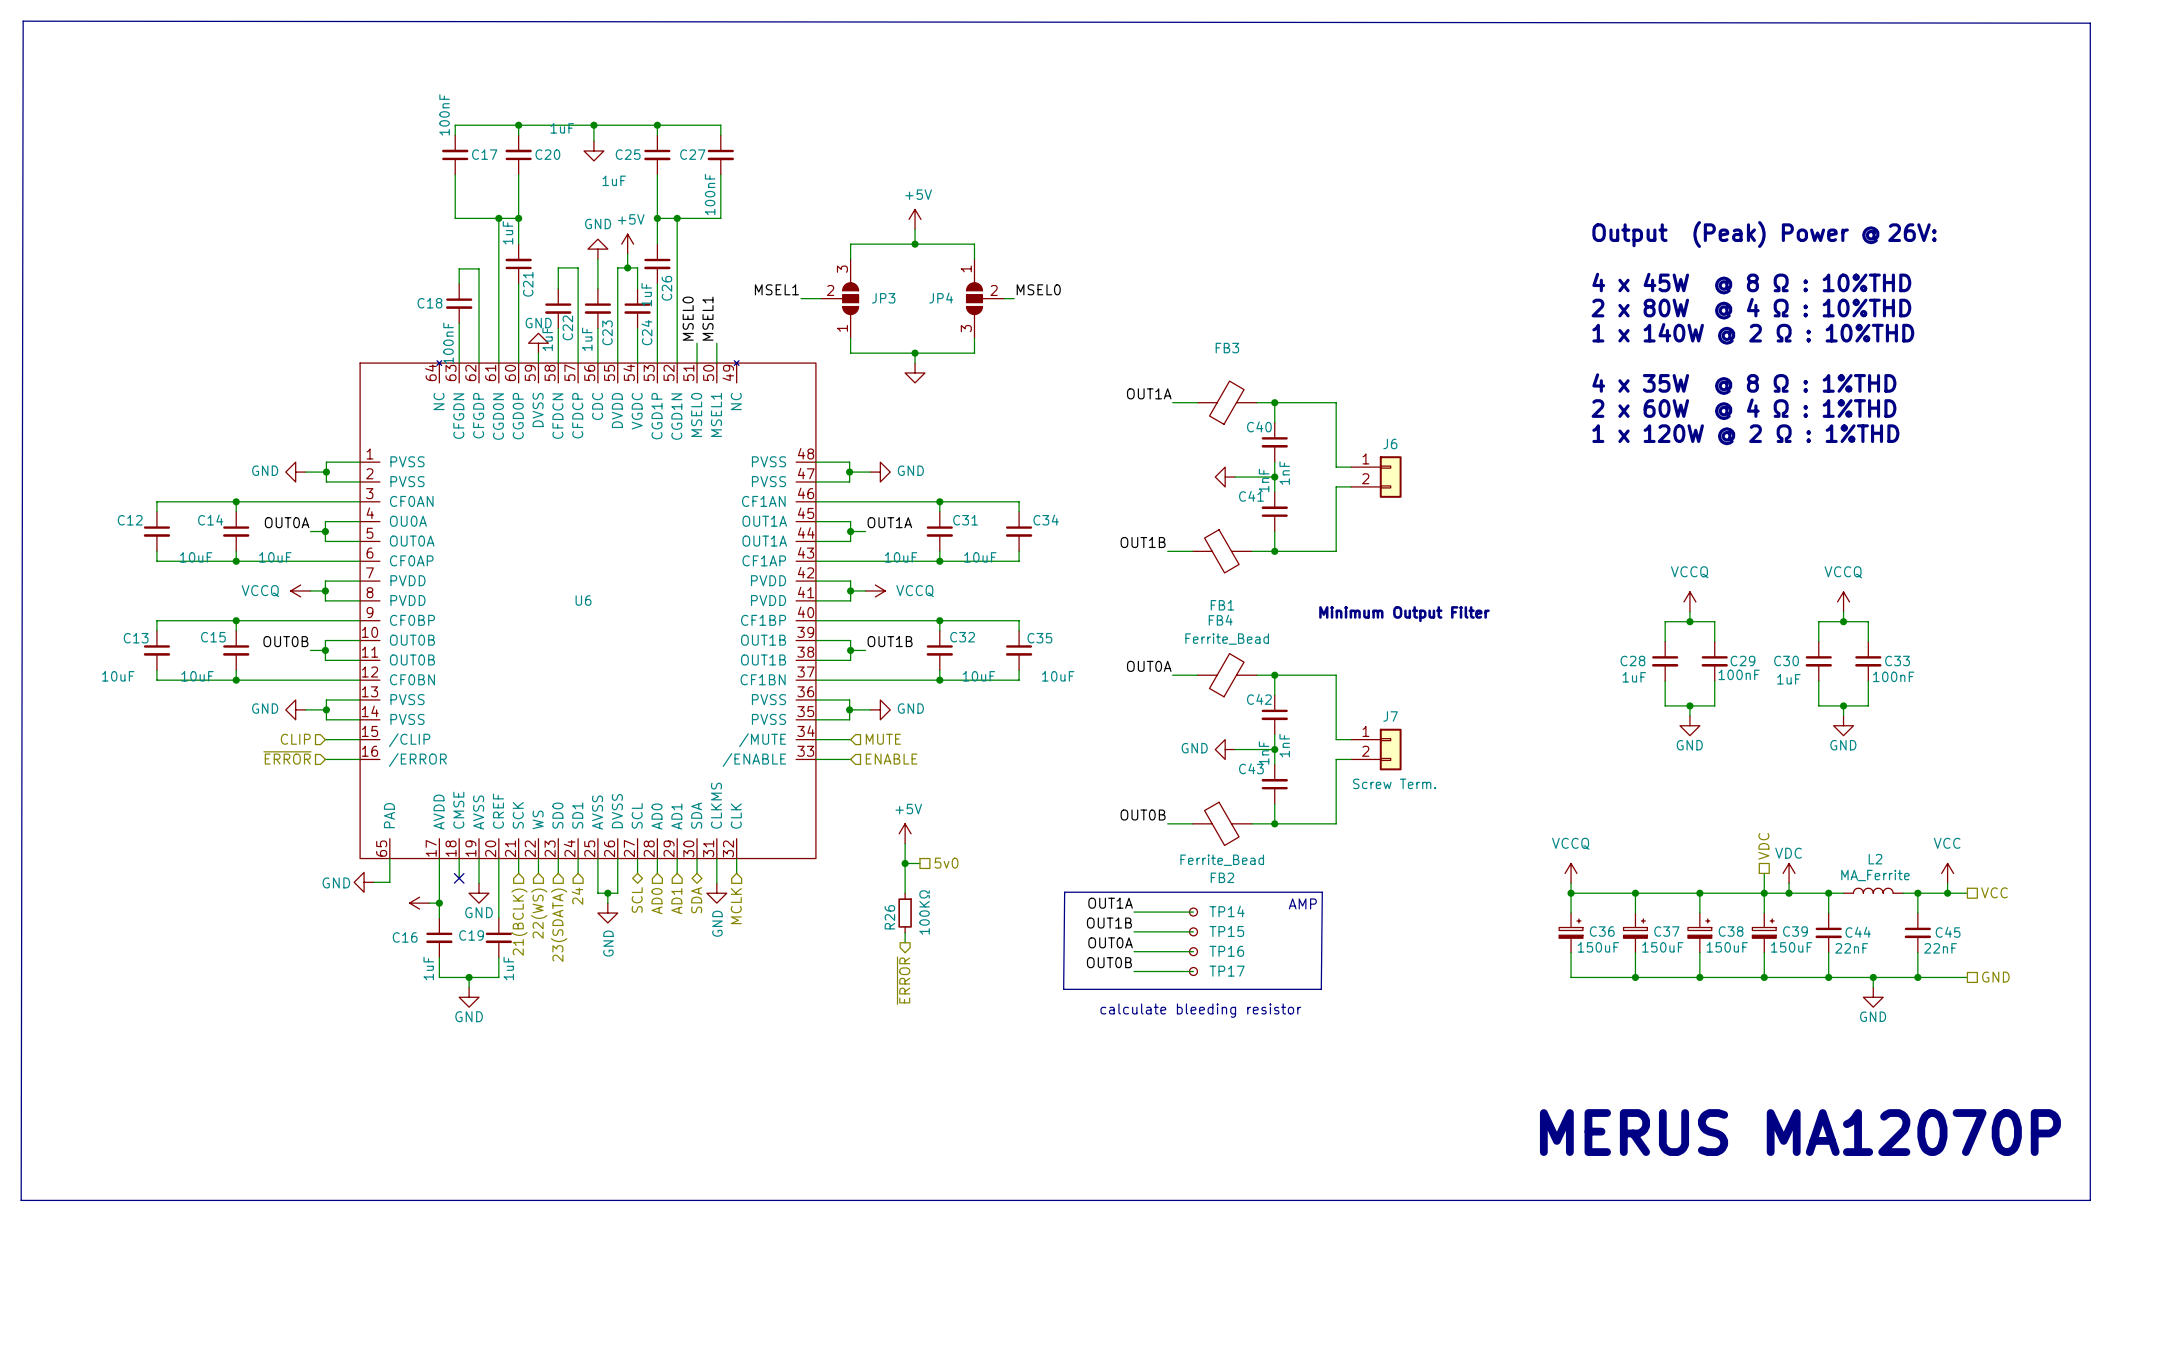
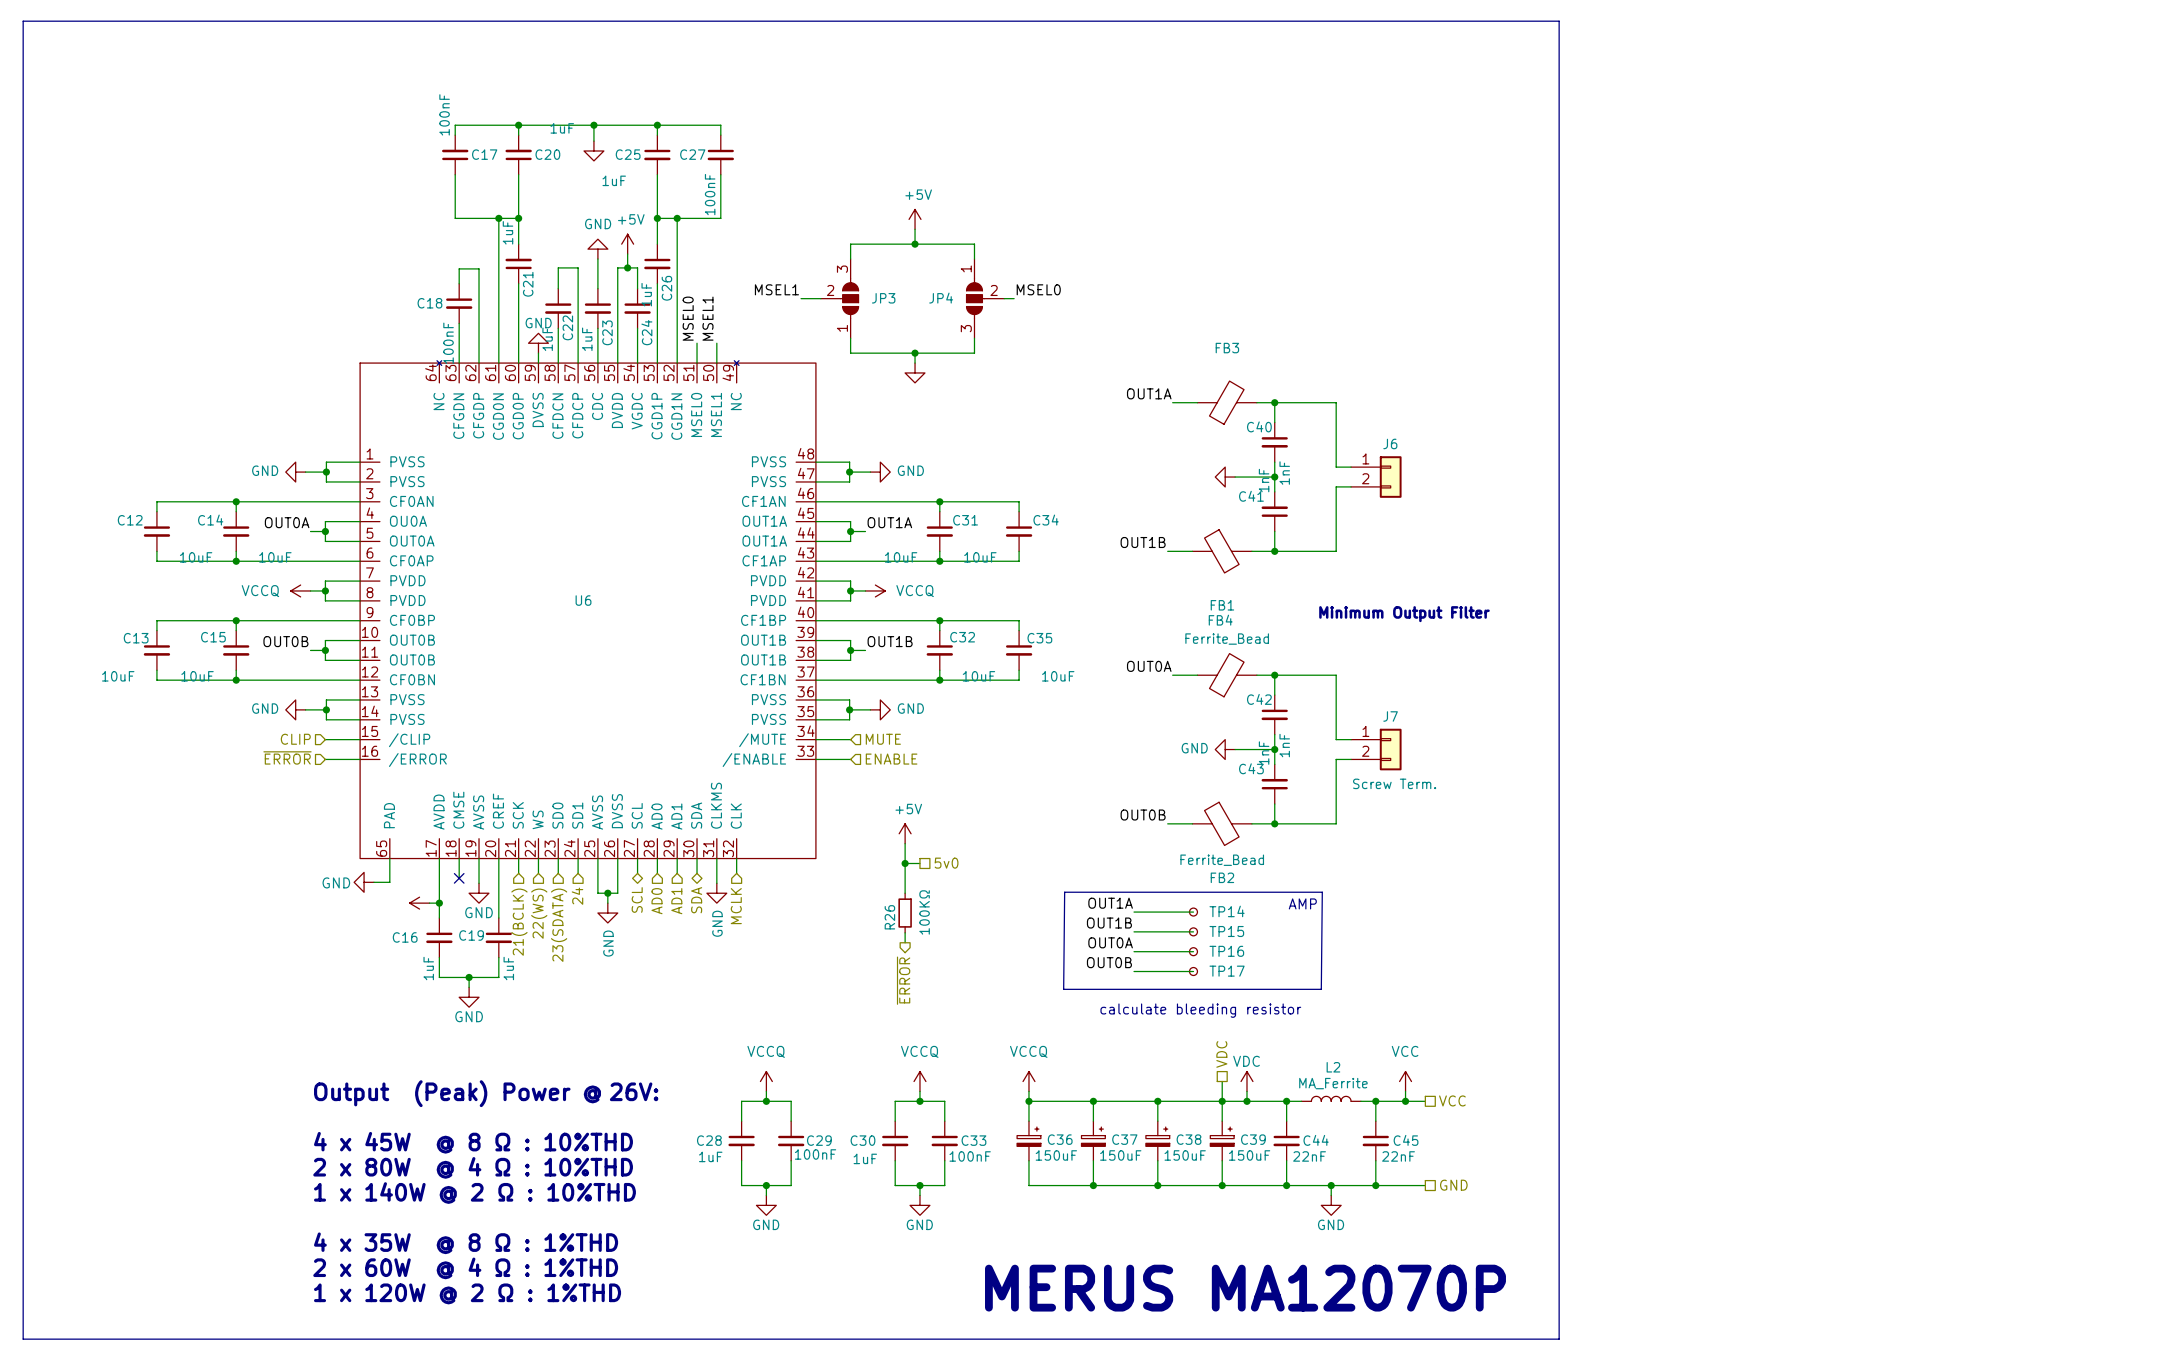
line: (23, 21) (21, 1200) (2090, 1200) (2090, 23) (23, 21) -> (23, 21) (23, 1339) (1559, 1339) (1559, 21) (23, 21)
text: Output (Peak) Power @ 26V: (1764, 234) -> none
text: 4 x 45W @ 8 Ω : 10%THD (1751, 283) -> none
text: 2 x 80W @ 4 Ω : 10%THD (1751, 308) -> none
text: 1 x 140W @ 2 Ω : 10%THD (1753, 333) -> none
text: 4 x 35W @ 8 Ω : 1%THD (1744, 384) -> none
text: 2 x 60W @ 4 Ω : 1%THD (1744, 409) -> none
text: 1 x 120W @ 2 Ω : 1%THD (1745, 434) -> none
power symbol: VCCQ (1689, 601) -> none
power symbol: VCCQ (1843, 601) -> none
wire: (1689, 611) (1689, 621) -> none
wire: (1843, 611) (1843, 621) -> none
junction: (1689, 621) -> none
junction: (1843, 621) -> none
wire: (1665, 641) (1665, 621) (1714, 621) (1714, 641) -> none
wire: (1818, 641) (1818, 621) (1868, 621) (1868, 641) -> none
C28 position: (1665, 661) -> (741, 1140)
C29 position: (1714, 661) -> (791, 1140)
C30 position: (1818, 661) -> (895, 1140)
C33 position: (1868, 661) -> (944, 1140)
wire: (1665, 681) (1665, 705) (1714, 705) (1714, 681) -> none
wire: (1818, 681) (1818, 705) (1868, 705) (1868, 681) -> none
wire: (1689, 705) (1689, 715) -> none
junction: (1689, 705) -> none
wire: (1843, 705) (1843, 715) -> none
junction: (1843, 705) -> none
power symbol: GND (1689, 725) -> none
power symbol: GND (1843, 725) -> none
hierarchical label: VDC (1763, 846) -> none
power symbol: VCCQ (1571, 873) -> none
wire: (1764, 873) (1764, 913) -> none
power symbol: VDC (1789, 873) -> none
power symbol: VCC (1947, 873) -> none
wire: (1571, 883) (1571, 913) -> none
wire: (1789, 883) (1789, 893) -> none
wire: (1947, 883) (1947, 893) -> none
L2 position: (1873, 890) -> (1331, 1098)
hierarchical label: VCC (1994, 892) -> none
wire: (1571, 893) (1843, 893) -> none
junction: (1571, 893) -> none
wire: (1635, 893) (1635, 913) -> none
junction: (1635, 893) -> none
wire: (1699, 893) (1699, 913) -> none
junction: (1699, 893) -> none
junction: (1764, 893) -> none
junction: (1789, 893) -> none
wire: (1828, 893) (1828, 913) -> none
junction: (1828, 893) -> none
wire: (1903, 893) (1967, 893) -> none
wire: (1917, 893) (1917, 913) -> none
junction: (1917, 893) -> none
junction: (1947, 893) -> none
C36 position: (1571, 932) -> (1028, 1140)
C37 position: (1635, 932) -> (1093, 1140)
C38 position: (1699, 932) -> (1157, 1140)
C39 position: (1764, 932) -> (1222, 1140)
C44 position: (1828, 932) -> (1286, 1140)
C45 position: (1917, 932) -> (1375, 1140)
wire: (1571, 952) (1571, 977) (1967, 977) -> none
wire: (1635, 952) (1635, 977) -> none
wire: (1699, 952) (1699, 977) -> none
wire: (1764, 952) (1764, 977) -> none
wire: (1828, 952) (1828, 977) -> none
wire: (1917, 952) (1917, 977) -> none
junction: (1635, 977) -> none
junction: (1699, 977) -> none
junction: (1764, 977) -> none
junction: (1828, 977) -> none
wire: (1873, 977) (1873, 987) -> none
junction: (1873, 977) -> none
junction: (1917, 977) -> none
hierarchical label: GND (1995, 977) -> none
power symbol: GND (1873, 997) -> none
hierarchical label: none -> VDC (1221, 1054)
power symbol: none -> VCCQ (766, 1081)
power symbol: none -> VCCQ (919, 1081)
power symbol: none -> VCCQ (1028, 1081)
wire: none -> (1222, 1081) (1222, 1121)
power symbol: none -> VDC (1246, 1081)
power symbol: none -> VCC (1405, 1081)
wire: none -> (766, 1091) (766, 1101)
wire: none -> (919, 1091) (919, 1101)
wire: none -> (1028, 1091) (1028, 1121)
wire: none -> (1246, 1091) (1246, 1101)
wire: none -> (1405, 1091) (1405, 1101)
text: none -> Output (Peak) Power @ 26V: (486, 1093)
hierarchical label: none -> VCC (1452, 1100)
junction: none -> (766, 1101)
junction: none -> (919, 1101)
wire: none -> (1028, 1101) (1301, 1101)
junction: none -> (1028, 1101)
wire: none -> (1093, 1101) (1093, 1121)
junction: none -> (1093, 1101)
wire: none -> (1157, 1101) (1157, 1121)
junction: none -> (1157, 1101)
junction: none -> (1222, 1101)
junction: none -> (1246, 1101)
wire: none -> (1286, 1101) (1286, 1121)
junction: none -> (1286, 1101)
wire: none -> (1360, 1101) (1425, 1101)
wire: none -> (1375, 1101) (1375, 1121)
junction: none -> (1375, 1101)
junction: none -> (1405, 1101)
wire: none -> (741, 1121) (741, 1101) (791, 1101) (791, 1121)
wire: none -> (895, 1121) (895, 1101) (944, 1101) (944, 1121)
text: MERUS MA12070P (1800, 1132) -> none
text: none -> 4 x 45W @ 8 Ω : 10%THD (473, 1142)
wire: none -> (741, 1160) (741, 1185) (791, 1185) (791, 1160)
wire: none -> (895, 1160) (895, 1185) (944, 1185) (944, 1160)
wire: none -> (1028, 1160) (1028, 1185) (1425, 1185)
wire: none -> (1093, 1160) (1093, 1185)
wire: none -> (1157, 1160) (1157, 1185)
wire: none -> (1222, 1160) (1222, 1185)
wire: none -> (1286, 1160) (1286, 1185)
wire: none -> (1375, 1160) (1375, 1185)
text: none -> 2 x 80W @ 4 Ω : 10%THD (473, 1167)
wire: none -> (766, 1185) (766, 1195)
junction: none -> (766, 1185)
wire: none -> (919, 1185) (919, 1195)
junction: none -> (919, 1185)
junction: none -> (1093, 1185)
junction: none -> (1157, 1185)
junction: none -> (1222, 1185)
junction: none -> (1286, 1185)
wire: none -> (1331, 1185) (1331, 1195)
junction: none -> (1331, 1185)
junction: none -> (1375, 1185)
hierarchical label: none -> GND (1453, 1185)
text: none -> 1 x 140W @ 2 Ω : 10%THD (474, 1193)
power symbol: none -> GND (766, 1205)
power symbol: none -> GND (919, 1205)
power symbol: none -> GND (1331, 1205)
text: none -> 4 x 35W @ 8 Ω : 1%THD (466, 1243)
text: none -> 2 x 60W @ 4 Ω : 1%THD (465, 1268)
text: none -> MERUS MA12070P (1245, 1288)
text: none -> 1 x 120W @ 2 Ω : 1%THD (467, 1293)

